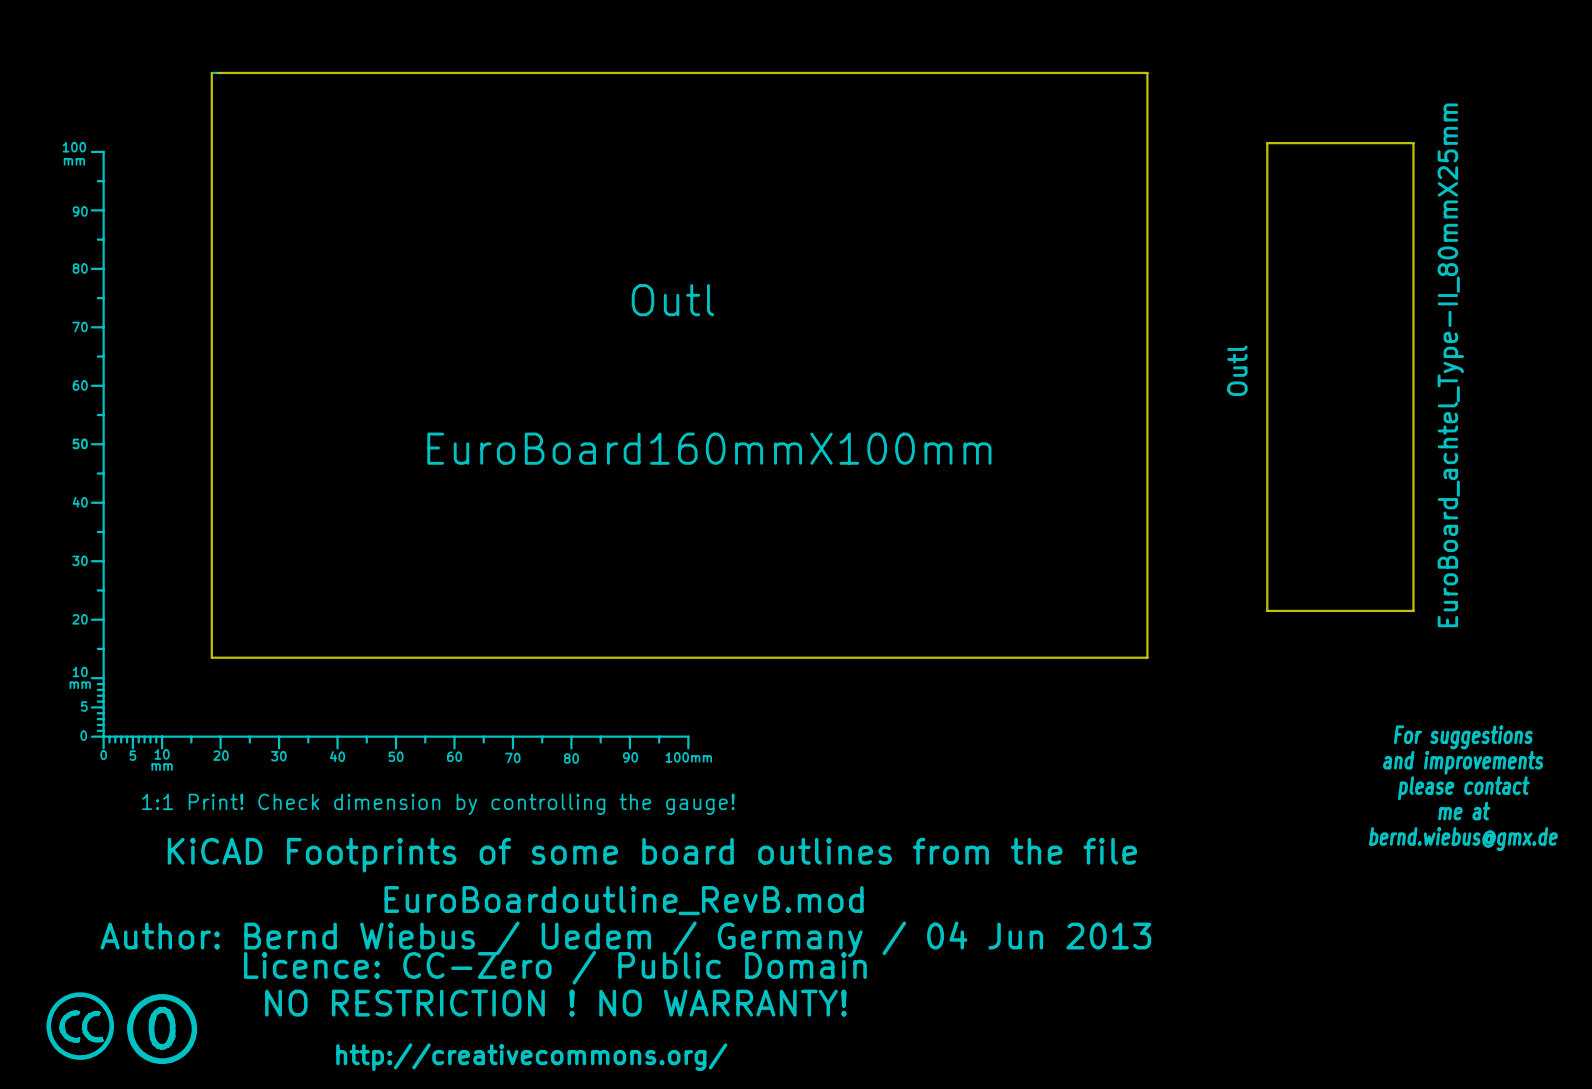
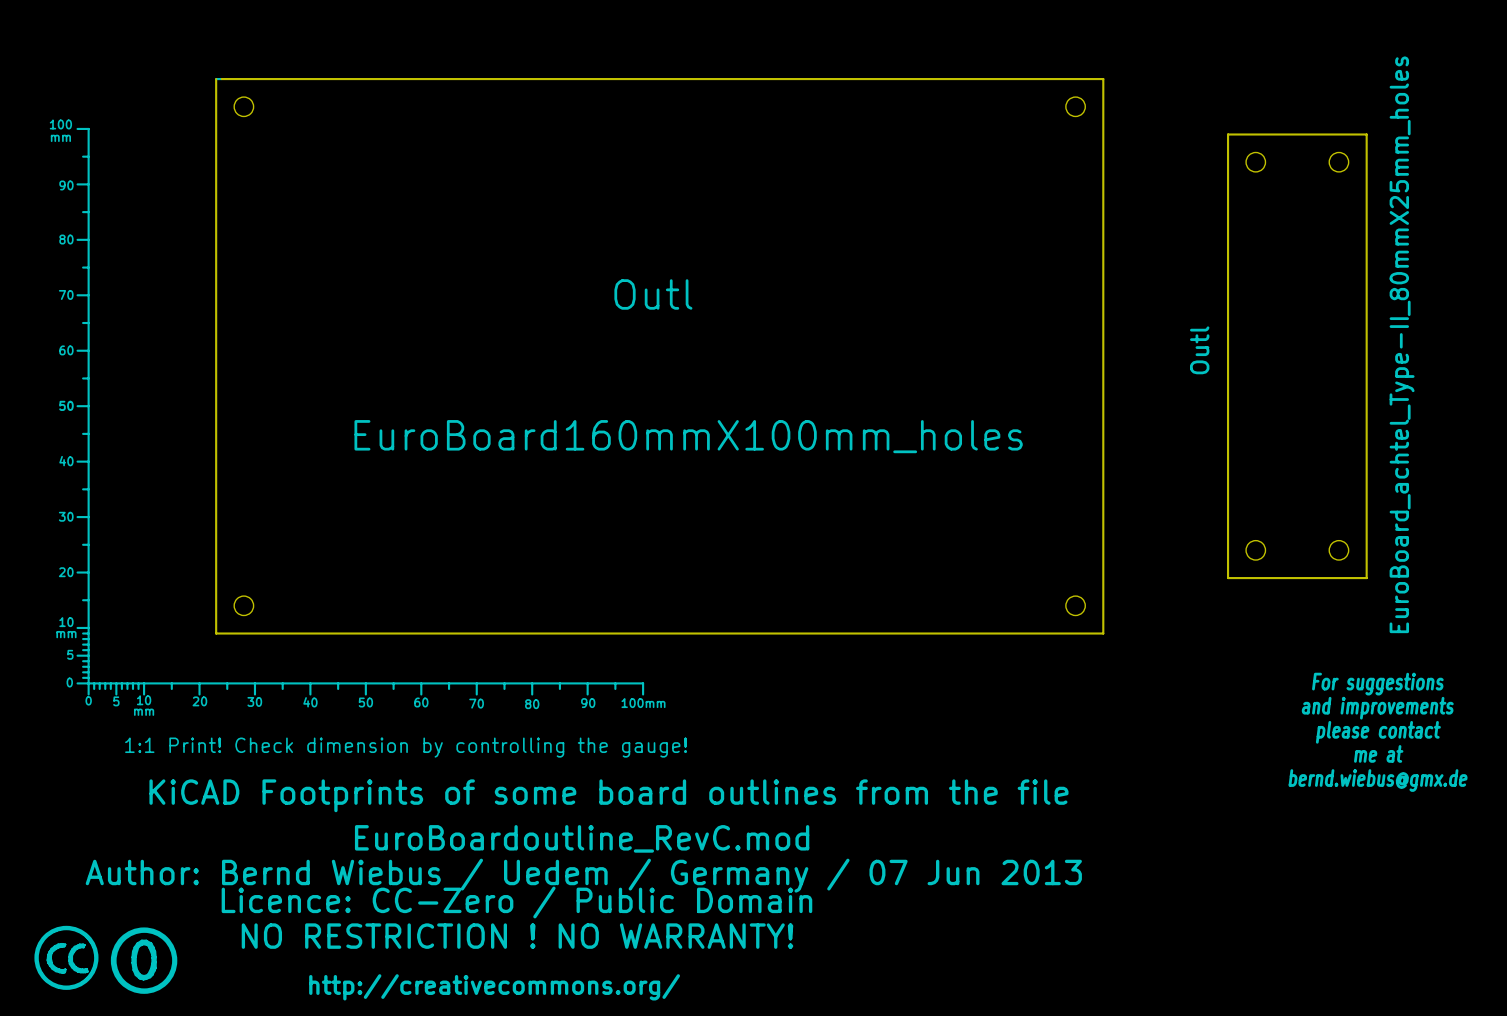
Outl: EuroBoard160mmX100mm (679, 365) -> none
Outl: EuroBoard_achtel_Type-II_80mmX25mm (1340, 377) -> none
Outl: none -> EuroBoard160mmX100mm_holes (659, 356)
Outl: none -> EuroBoard_achtel_Type-II_80mmX25mm_holes (1297, 356)
text: EuroBoardoutline_RevB.mod (624, 900) -> EuroBoardoutline_RevC.mod (582, 838)
text: Author: Bernd Wiebus / Uedem / Germany / 04 Jun 2013 (625, 939) -> Author: Bernd Wiebus / Uedem / Germany / 07 Jun 2013 (583, 875)

